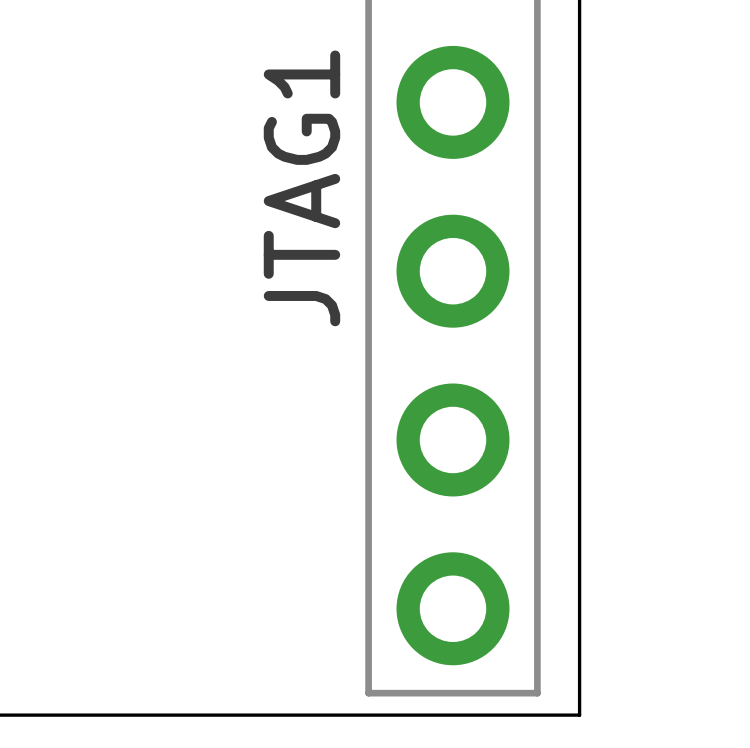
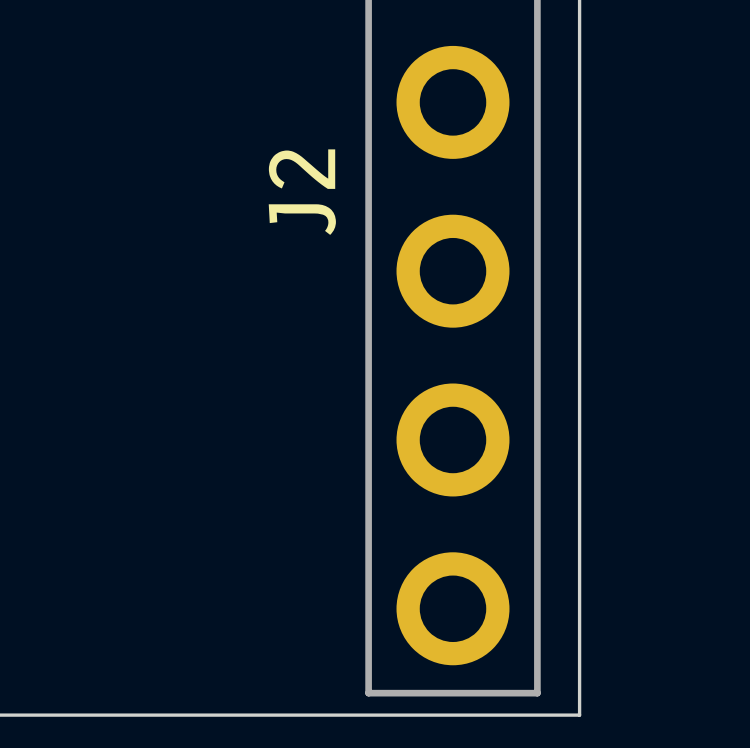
JTAG1 name: JTAG1 (301, 188) -> J2 (302, 192)

